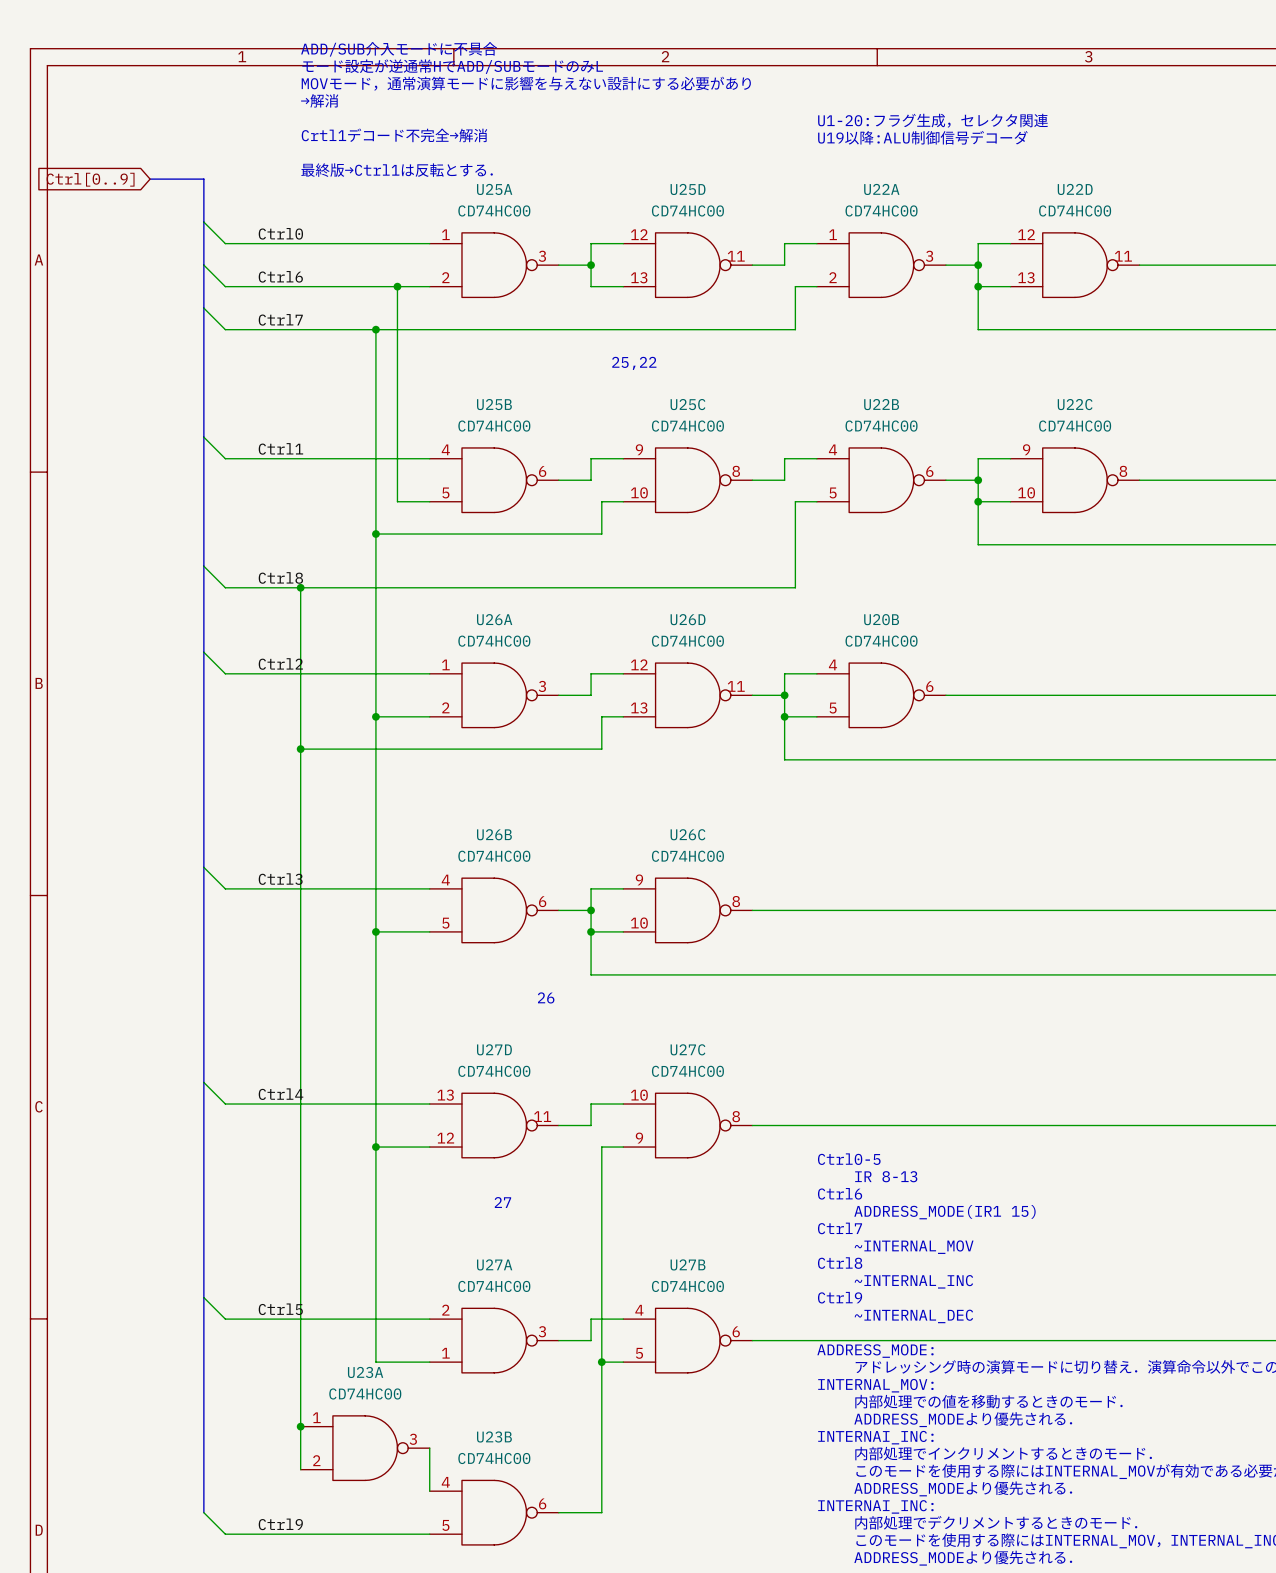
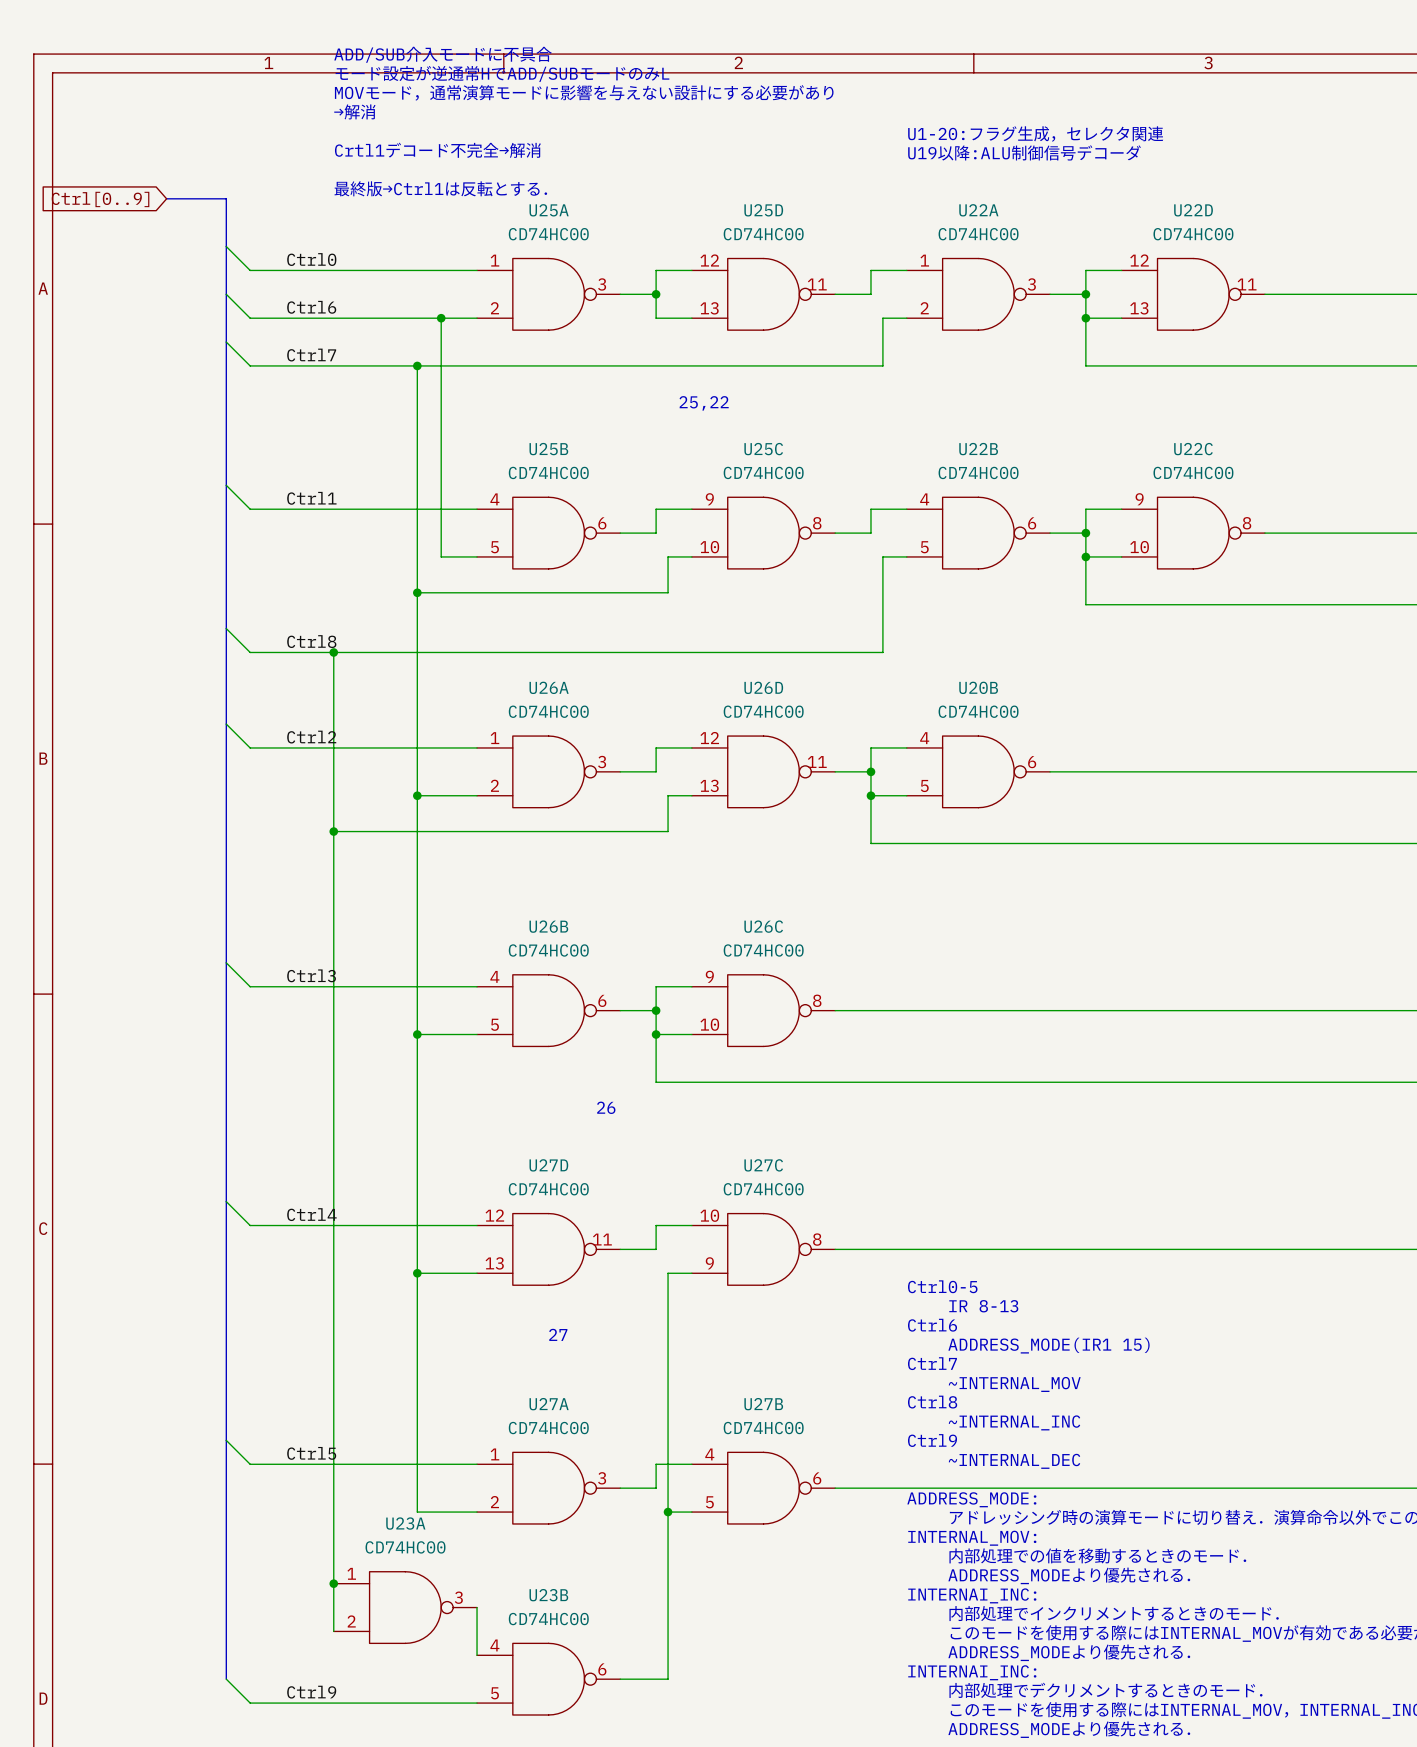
U27D flip: as is (494, 1125) -> up-down (548, 1249)
U27A flip: as is (494, 1340) -> up-down (548, 1488)

